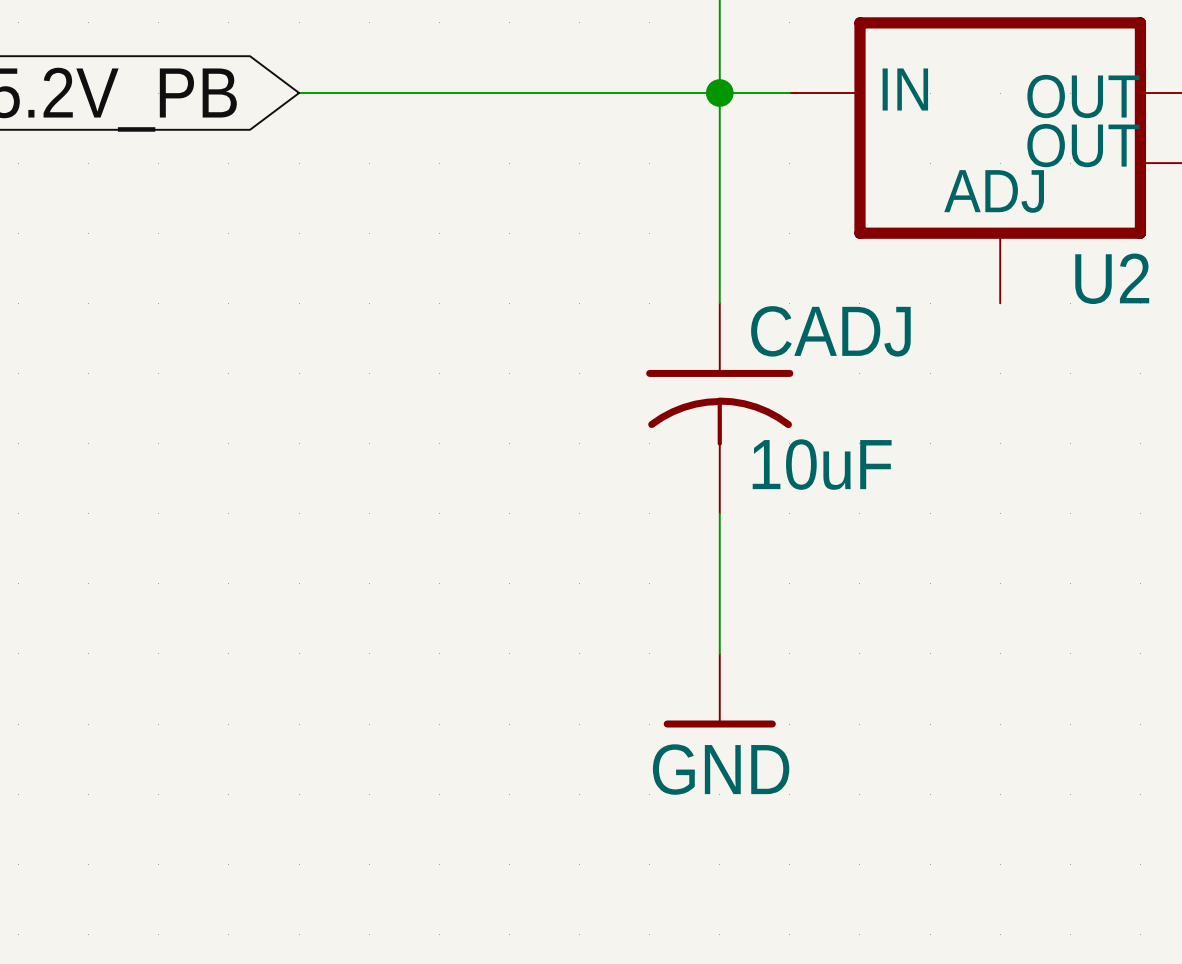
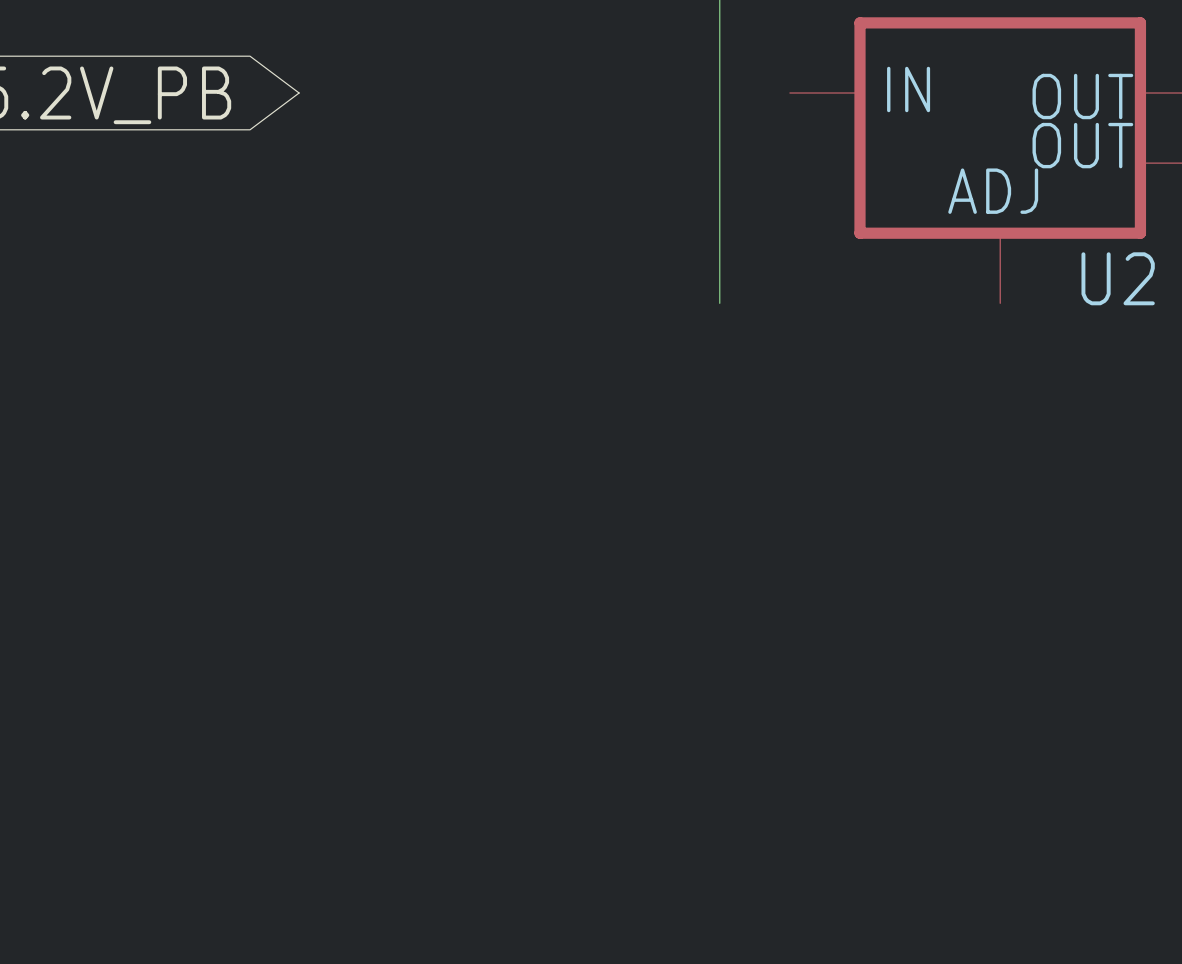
wire: (299, 93) (789, 93) -> none
junction: (719, 93) -> none
CADJ: 10uF (719, 408) -> none
wire: (719, 513) (719, 653) -> none
power symbol: GND (719, 690) -> none

